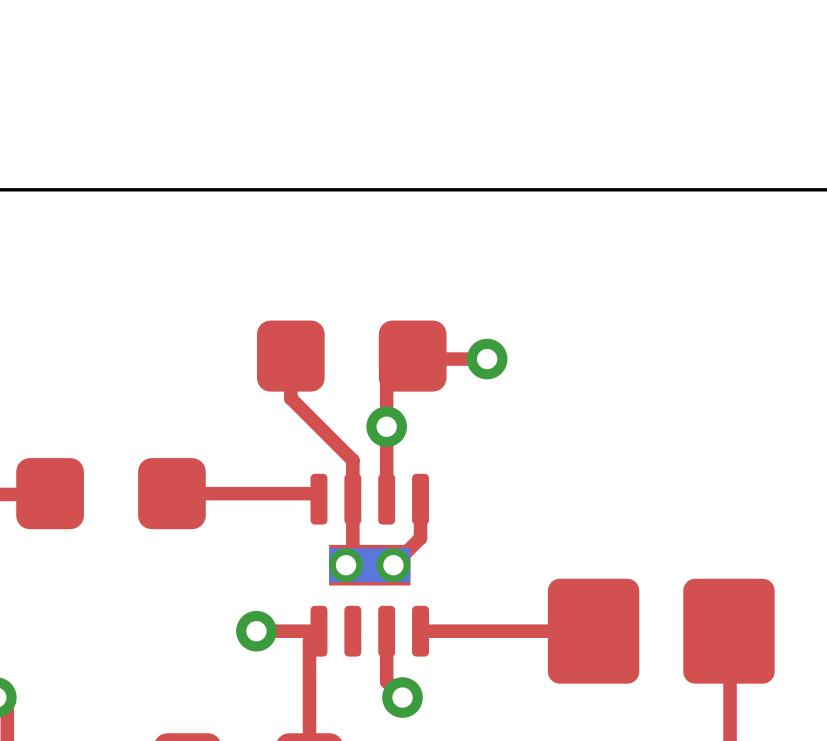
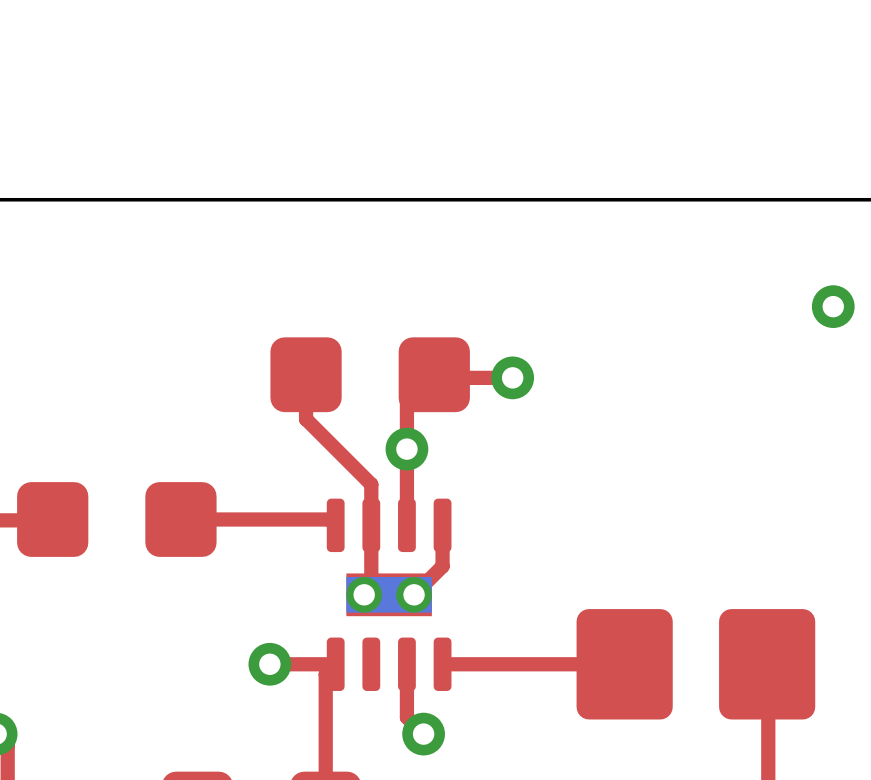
via: none -> (833, 306)

